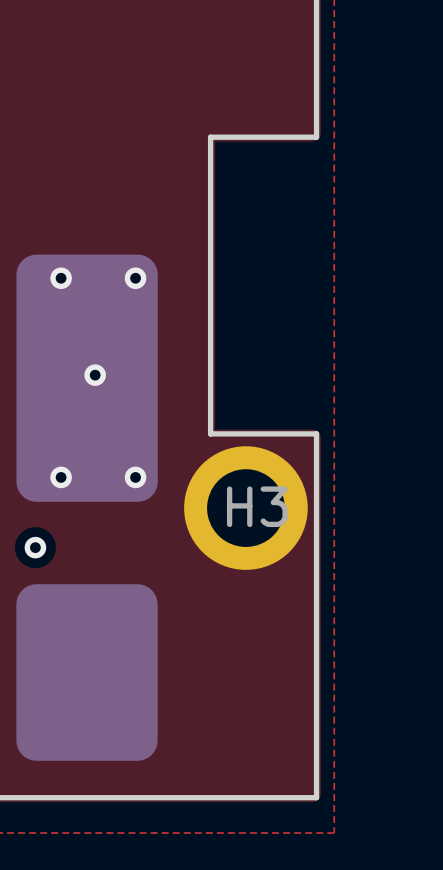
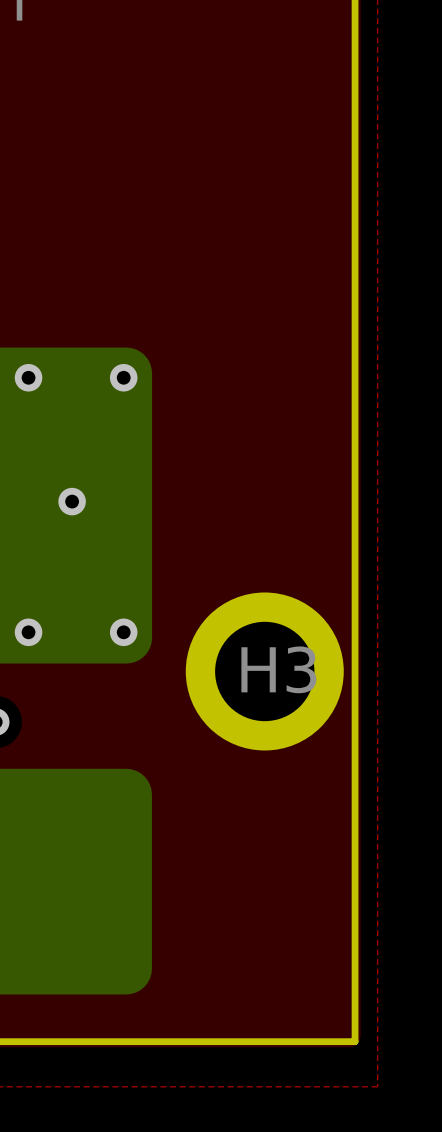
board edge: (316, 137) (210, 137) (210, 433) (316, 433) -> (355, 197) (355, 576)

